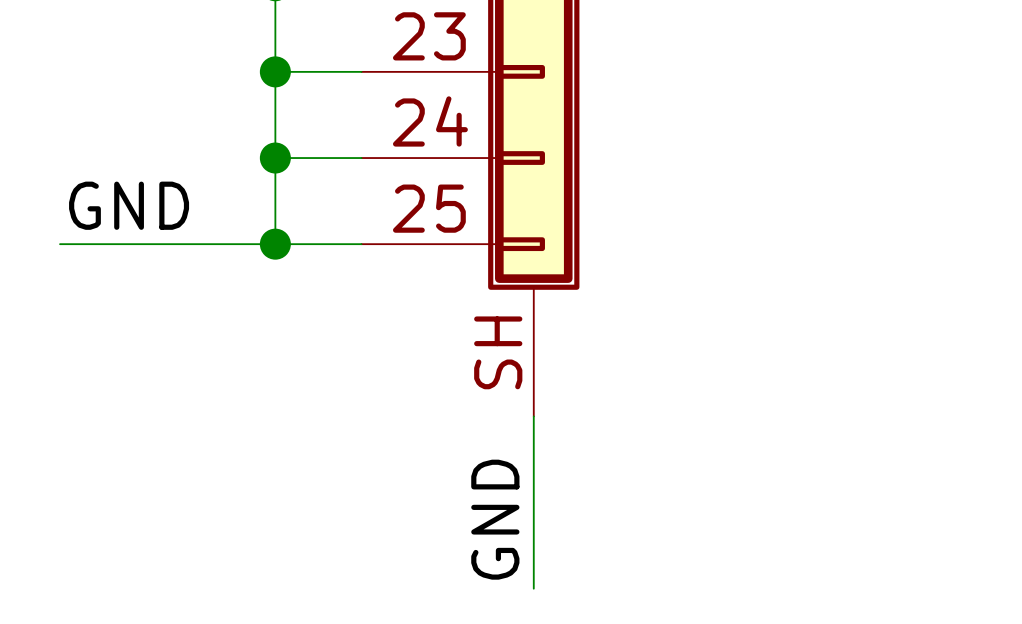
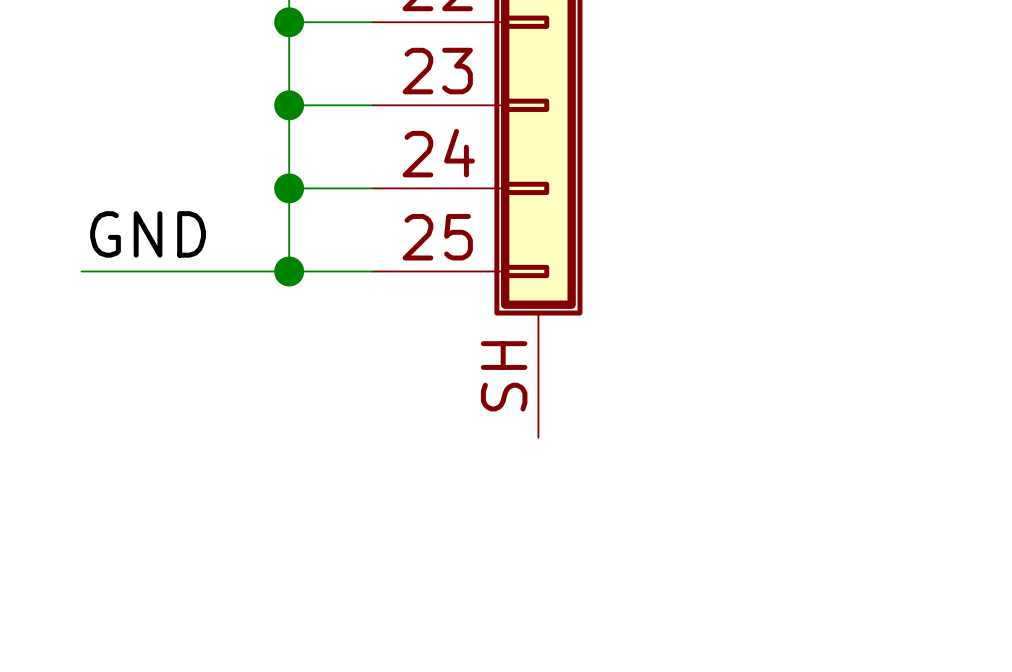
wire: (533, 416) (533, 588) -> none
label: GND (495, 519) -> none

